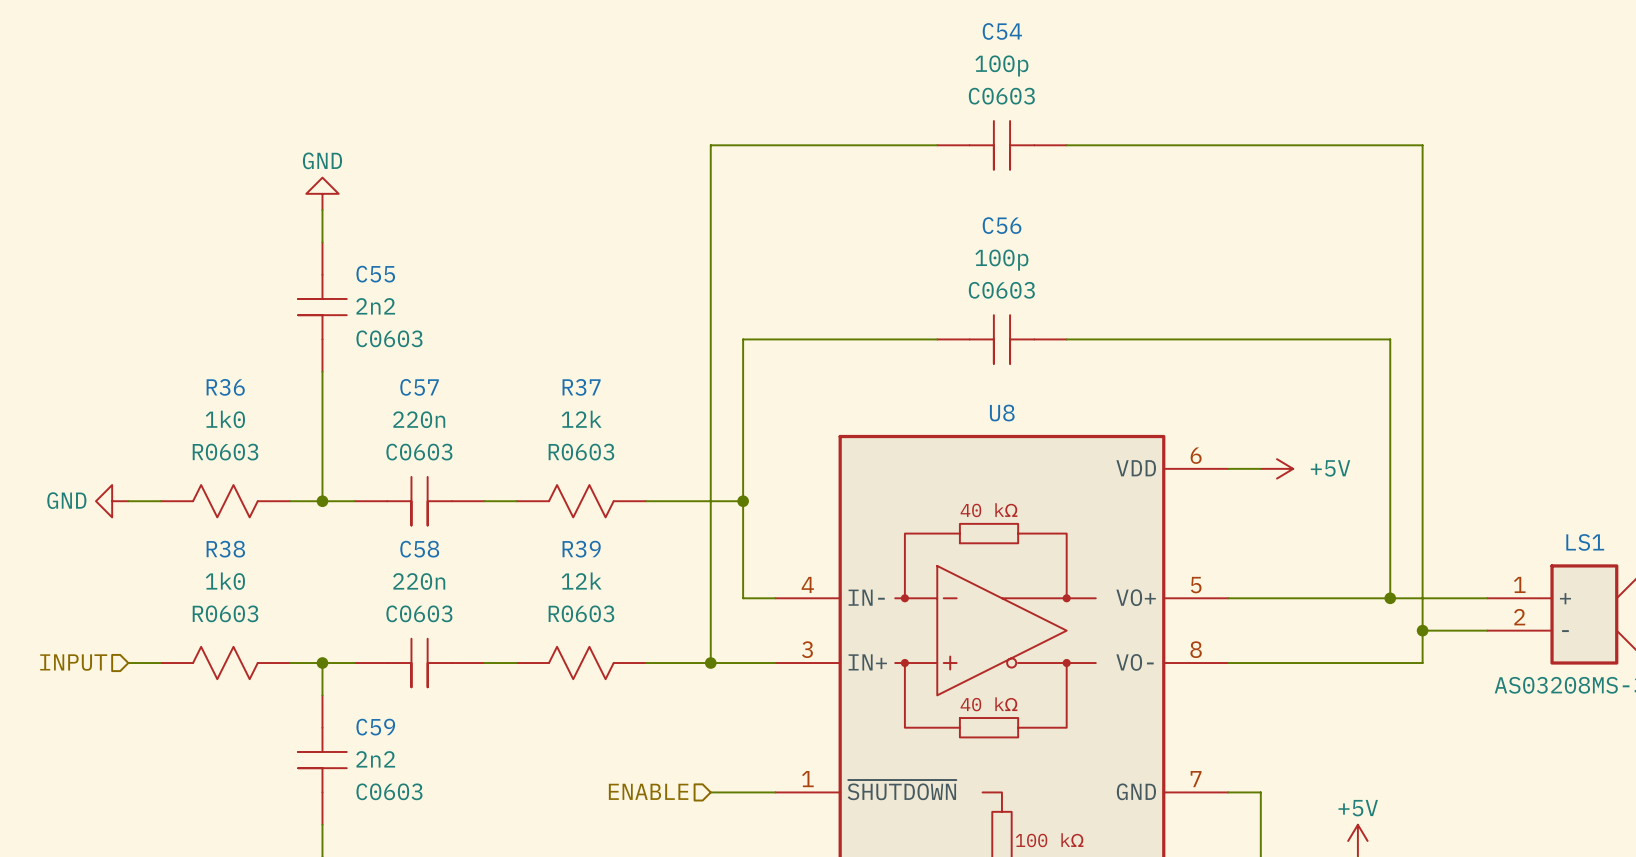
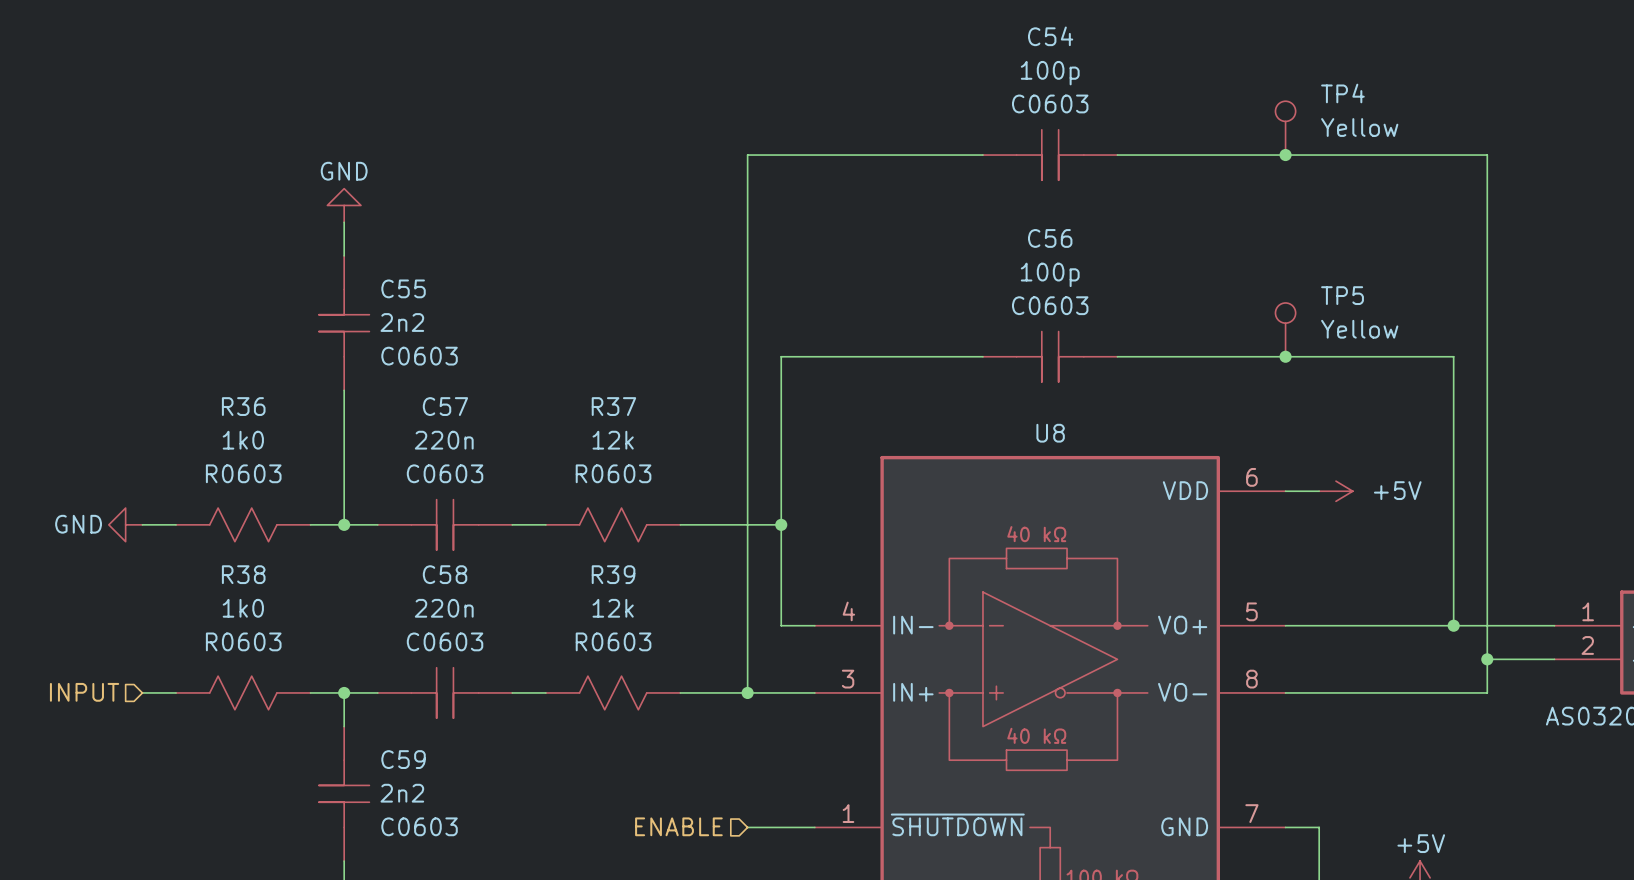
TP4: none -> (1285, 128)
junction: none -> (1285, 155)
TP5: none -> (1285, 329)
junction: none -> (1285, 356)

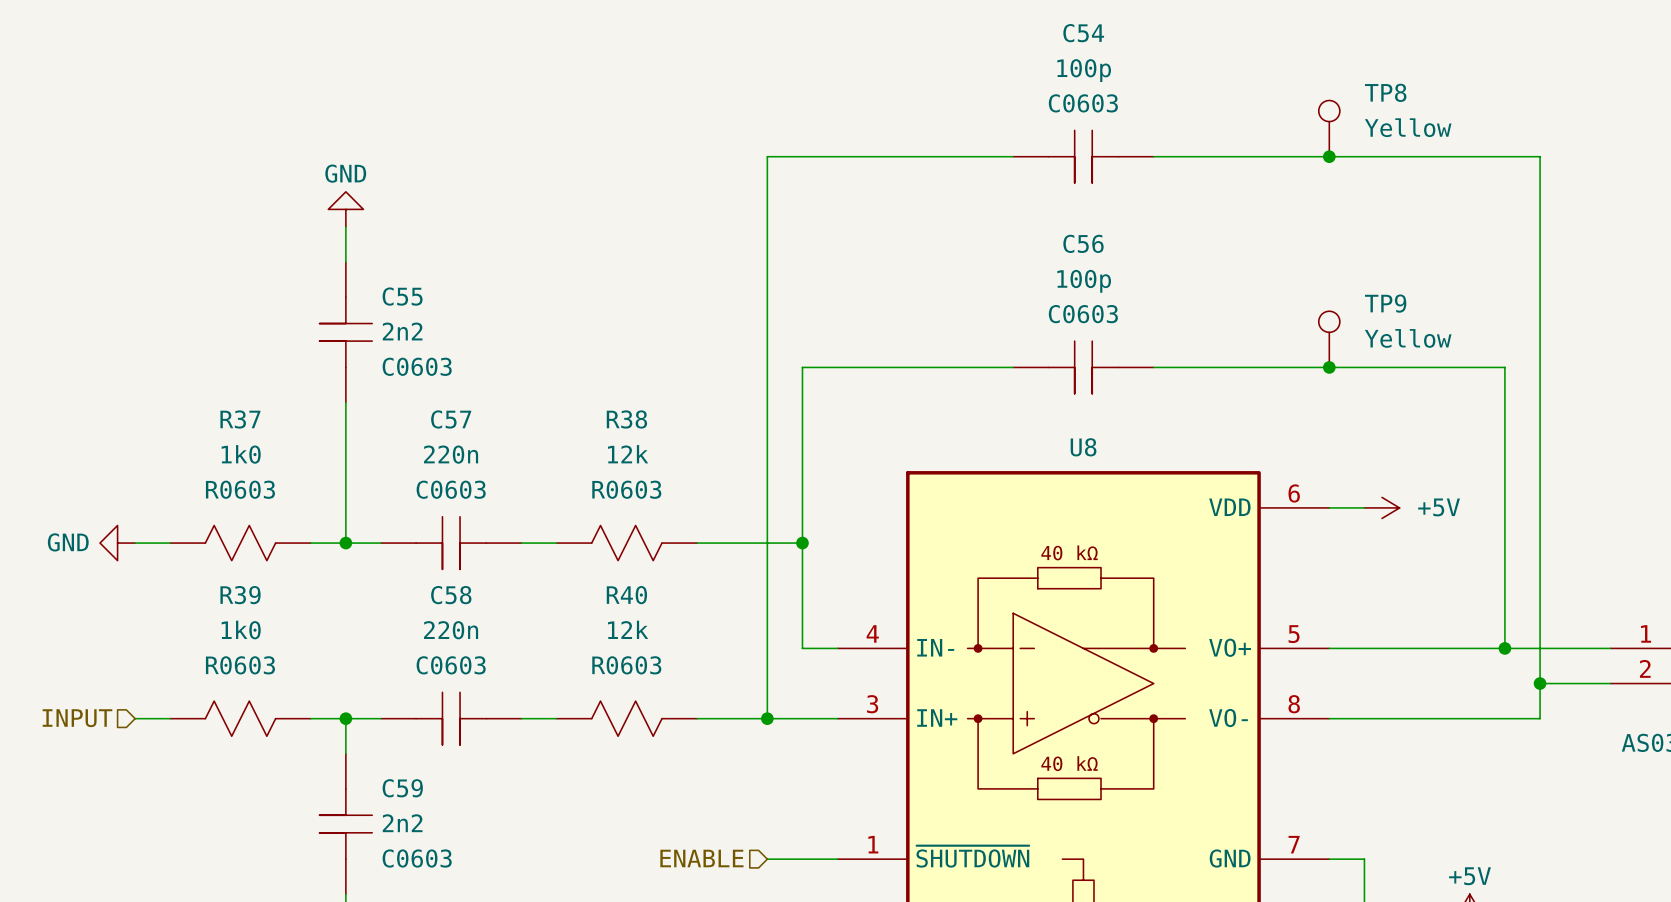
TP4 name: TP4 (1342, 93) -> TP8 (1385, 92)
TP5 name: TP5 (1342, 295) -> TP9 (1385, 303)
R36 name: R36 (243, 406) -> R37 (240, 419)
R37 name: R37 (613, 406) -> R38 (626, 419)
R38 name: R38 (243, 574) -> R39 (240, 595)
R39 name: R39 (613, 574) -> R40 (626, 595)

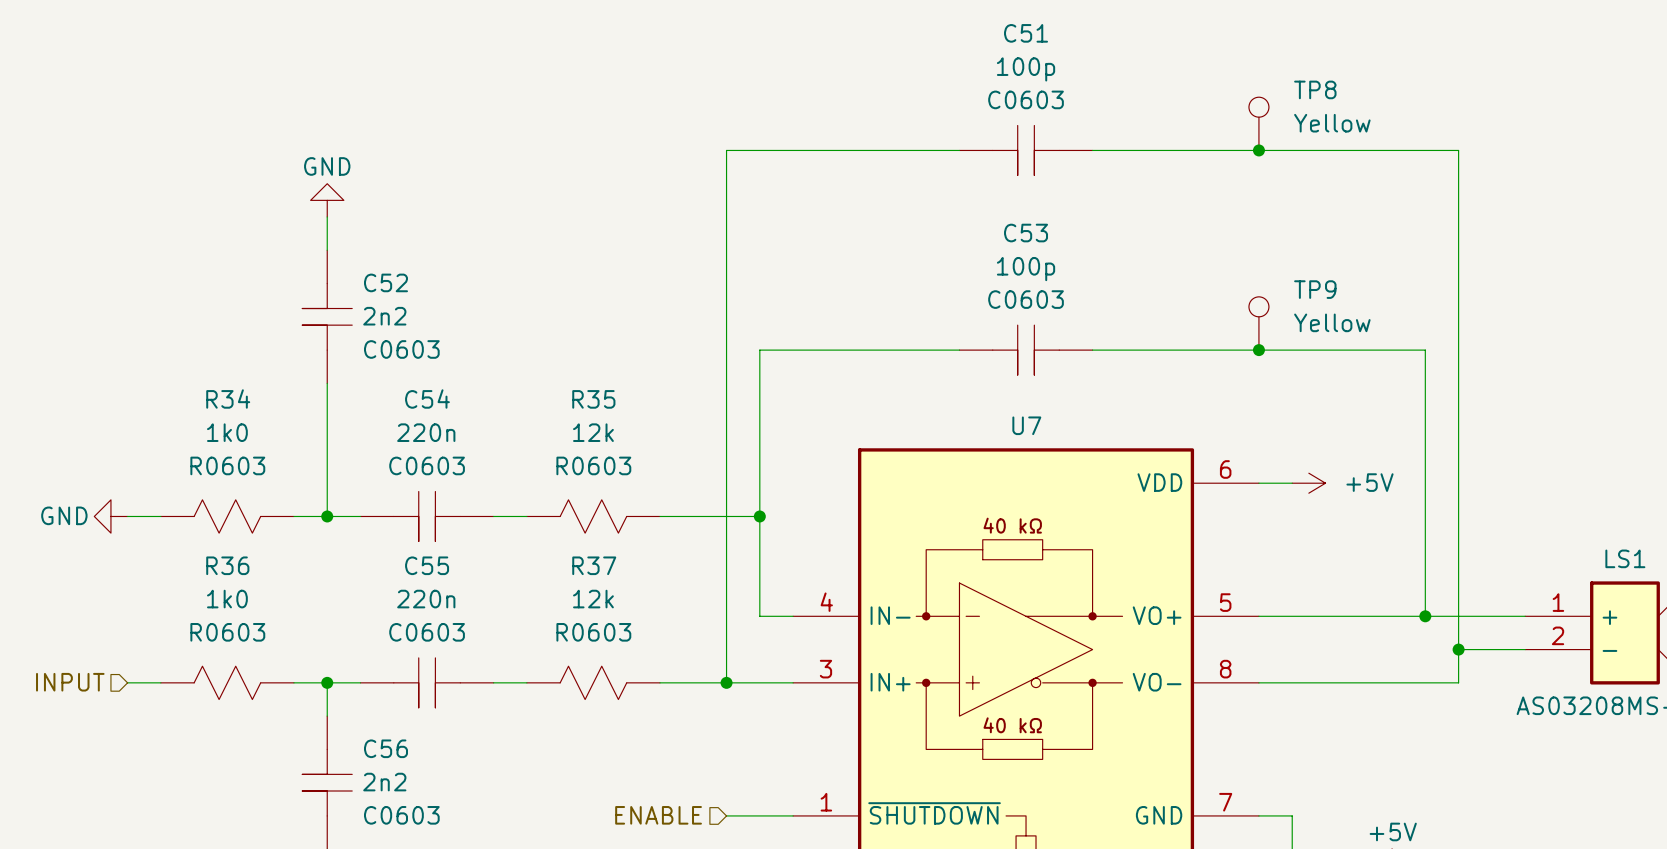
C54 name: C54 (1083, 33) -> C51 (1026, 33)
C56 name: C56 (1083, 243) -> C53 (1026, 233)
C55 name: C55 (402, 296) -> C52 (385, 282)
R37 name: R37 (240, 419) -> R34 (228, 399)
C57 name: C57 (451, 419) -> C54 (427, 399)
R38 name: R38 (626, 419) -> R35 (593, 399)
U8 name: U8 (1083, 447) -> U7 (1026, 425)
R39 name: R39 (240, 595) -> R36 (227, 565)
C58 name: C58 (451, 595) -> C55 (427, 565)
R40 name: R40 (626, 595) -> R37 (594, 565)
C59 name: C59 (402, 788) -> C56 (385, 748)

